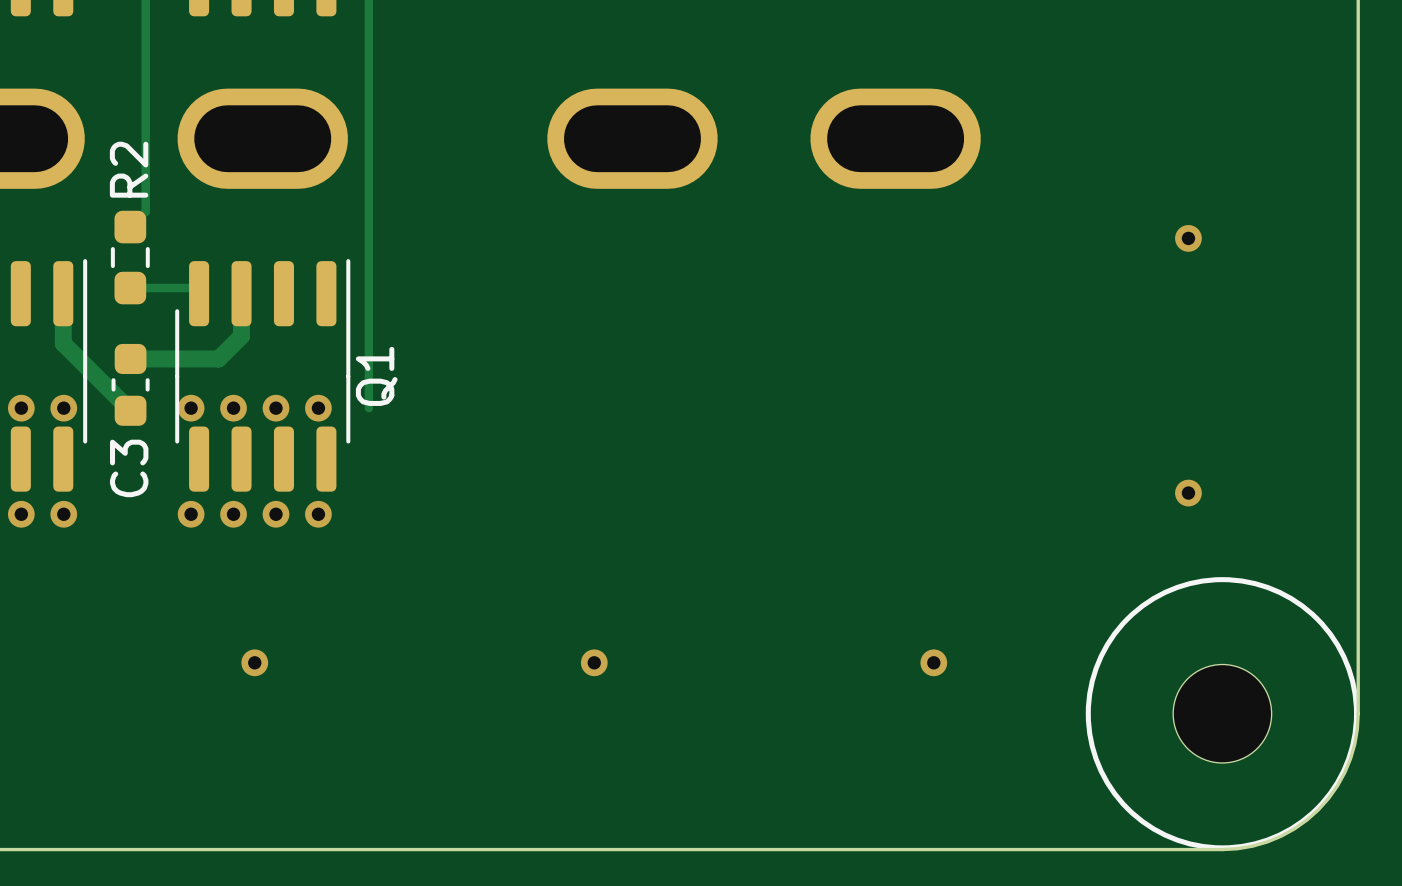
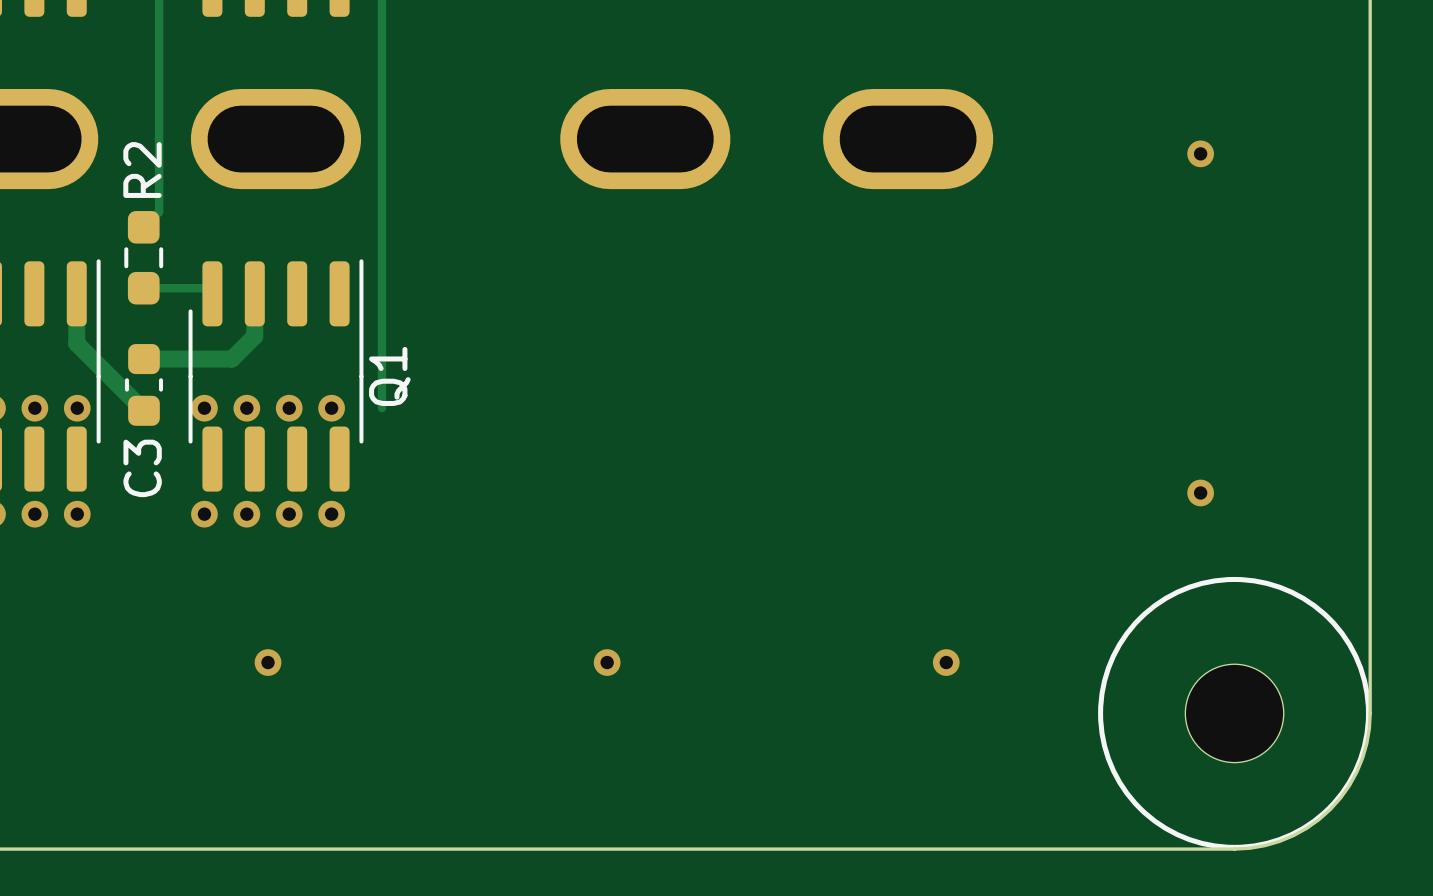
via position: (1188, 238) -> (1200, 153)

